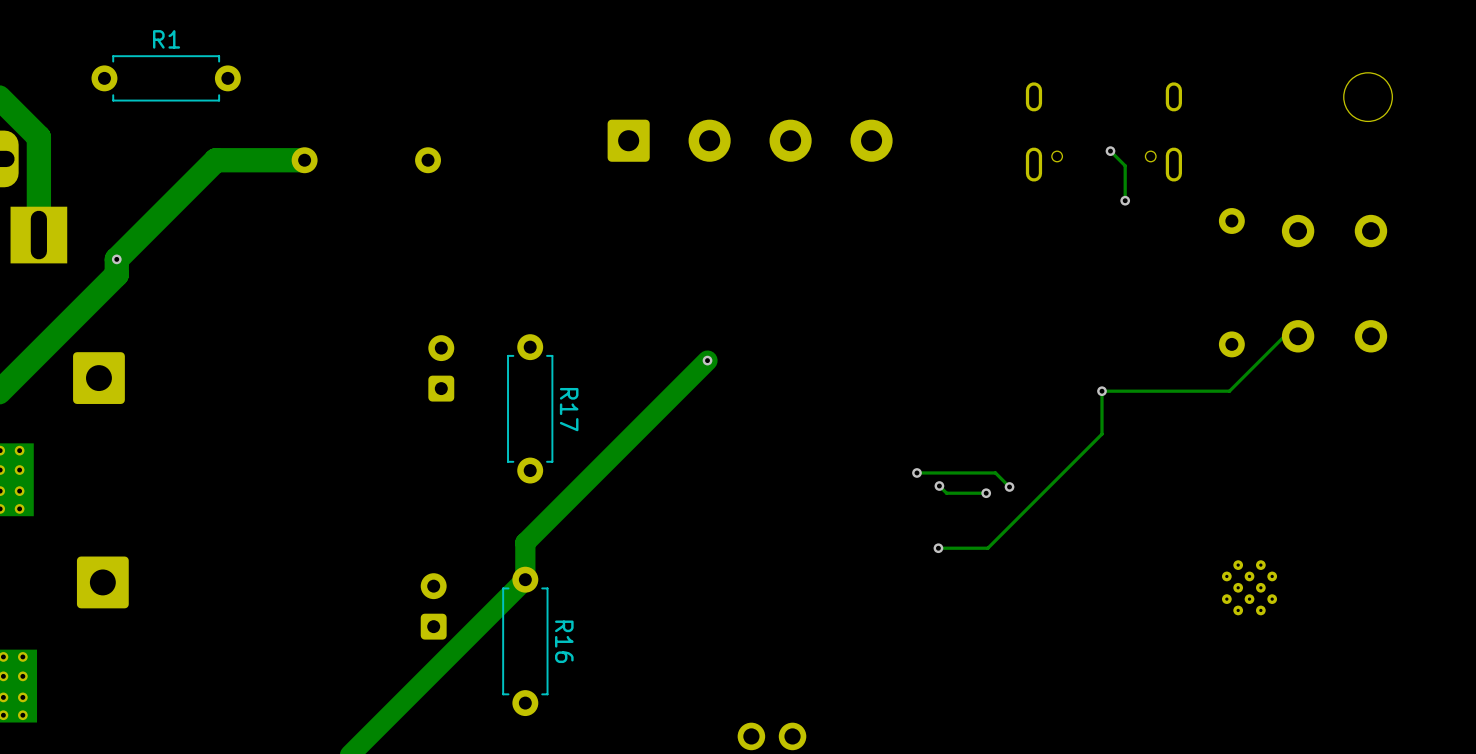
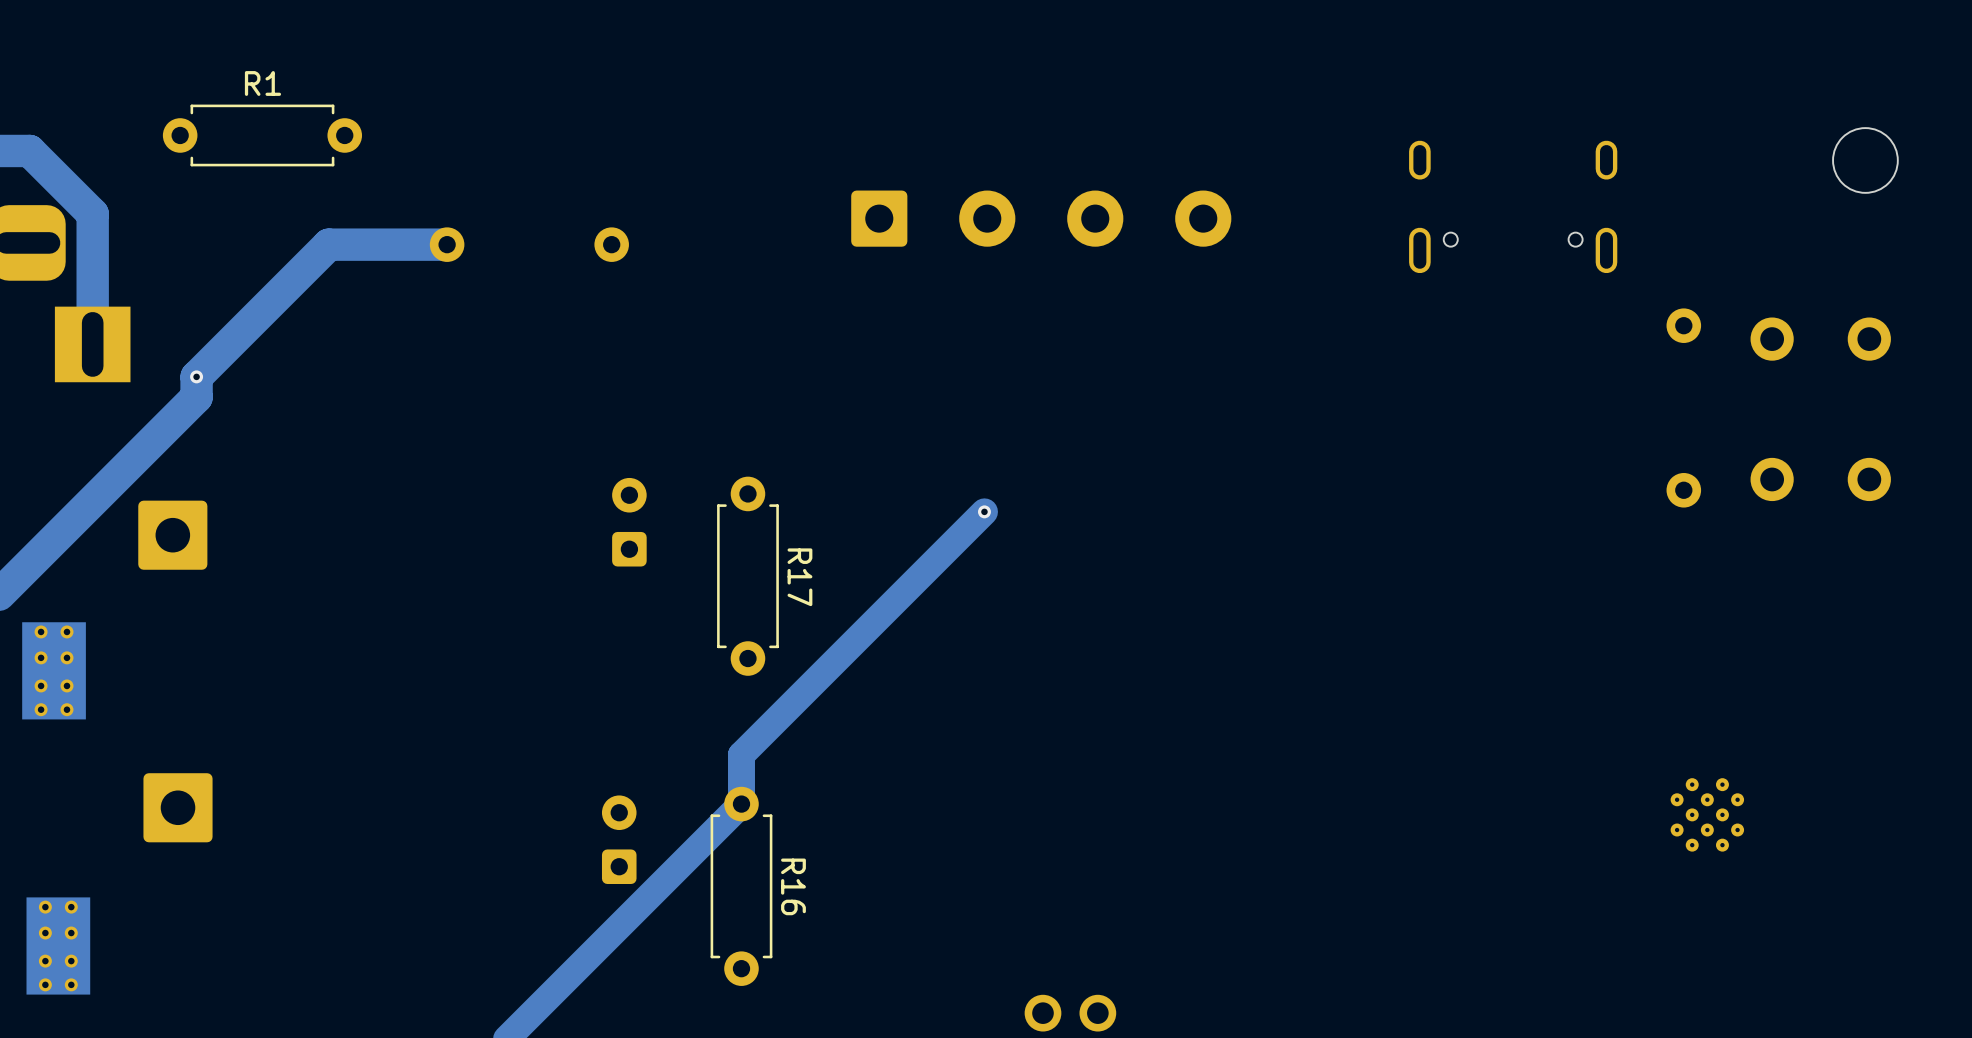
track: (1110, 151) (1125, 165) (1125, 200) -> none
via: (1110, 151) -> none
via: (1125, 200) -> none
track: (1298, 336) (1284, 336) (1229, 391) (1101, 391) (1101, 434) (987, 548) (938, 548) -> none
via: (1101, 391) -> none
track: (916, 472) (995, 472) (1009, 486) -> none
via: (916, 472) -> none
track: (939, 486) (946, 493) (986, 493) -> none
via: (939, 486) -> none
via: (1009, 486) -> none
via: (986, 493) -> none
via: (938, 548) -> none

